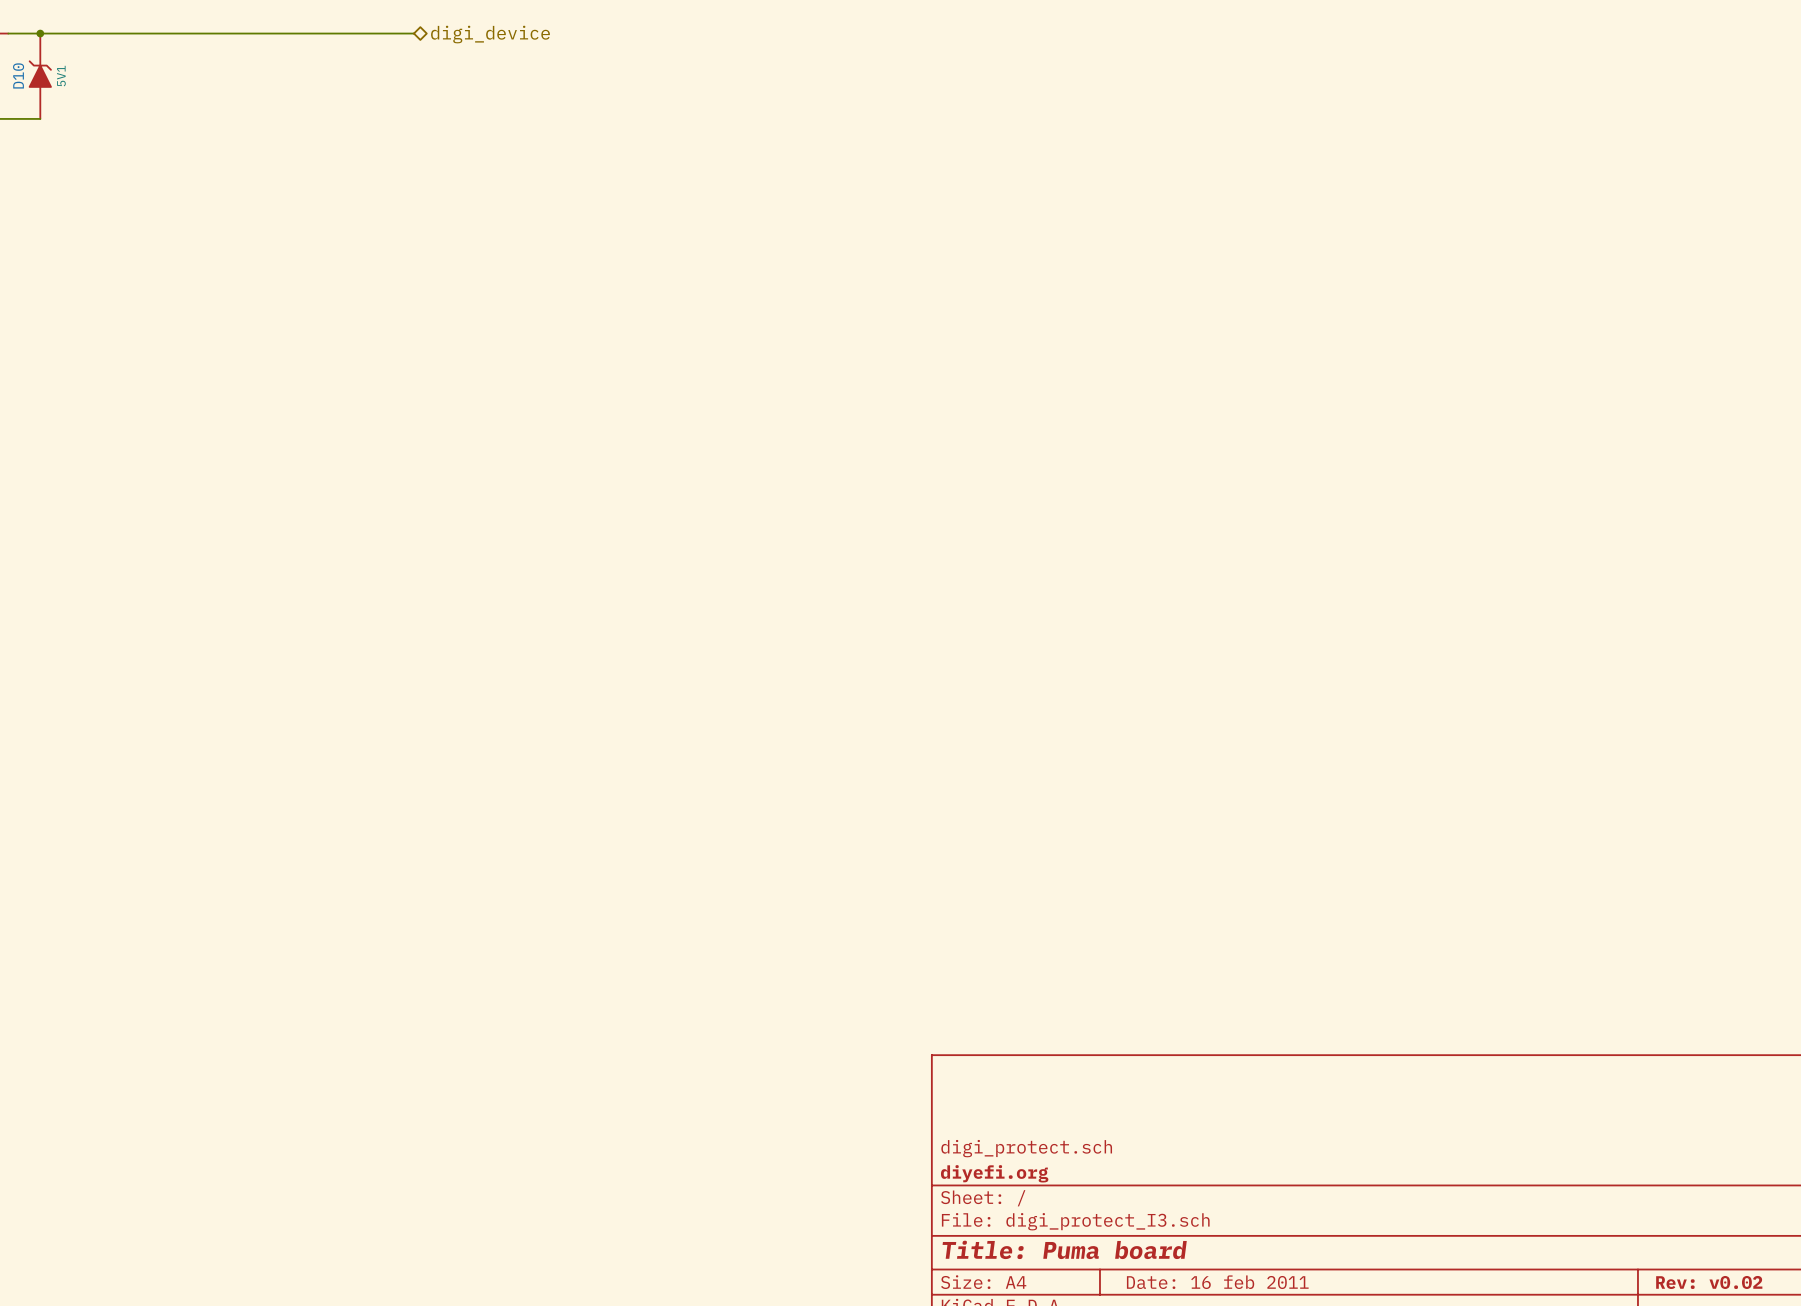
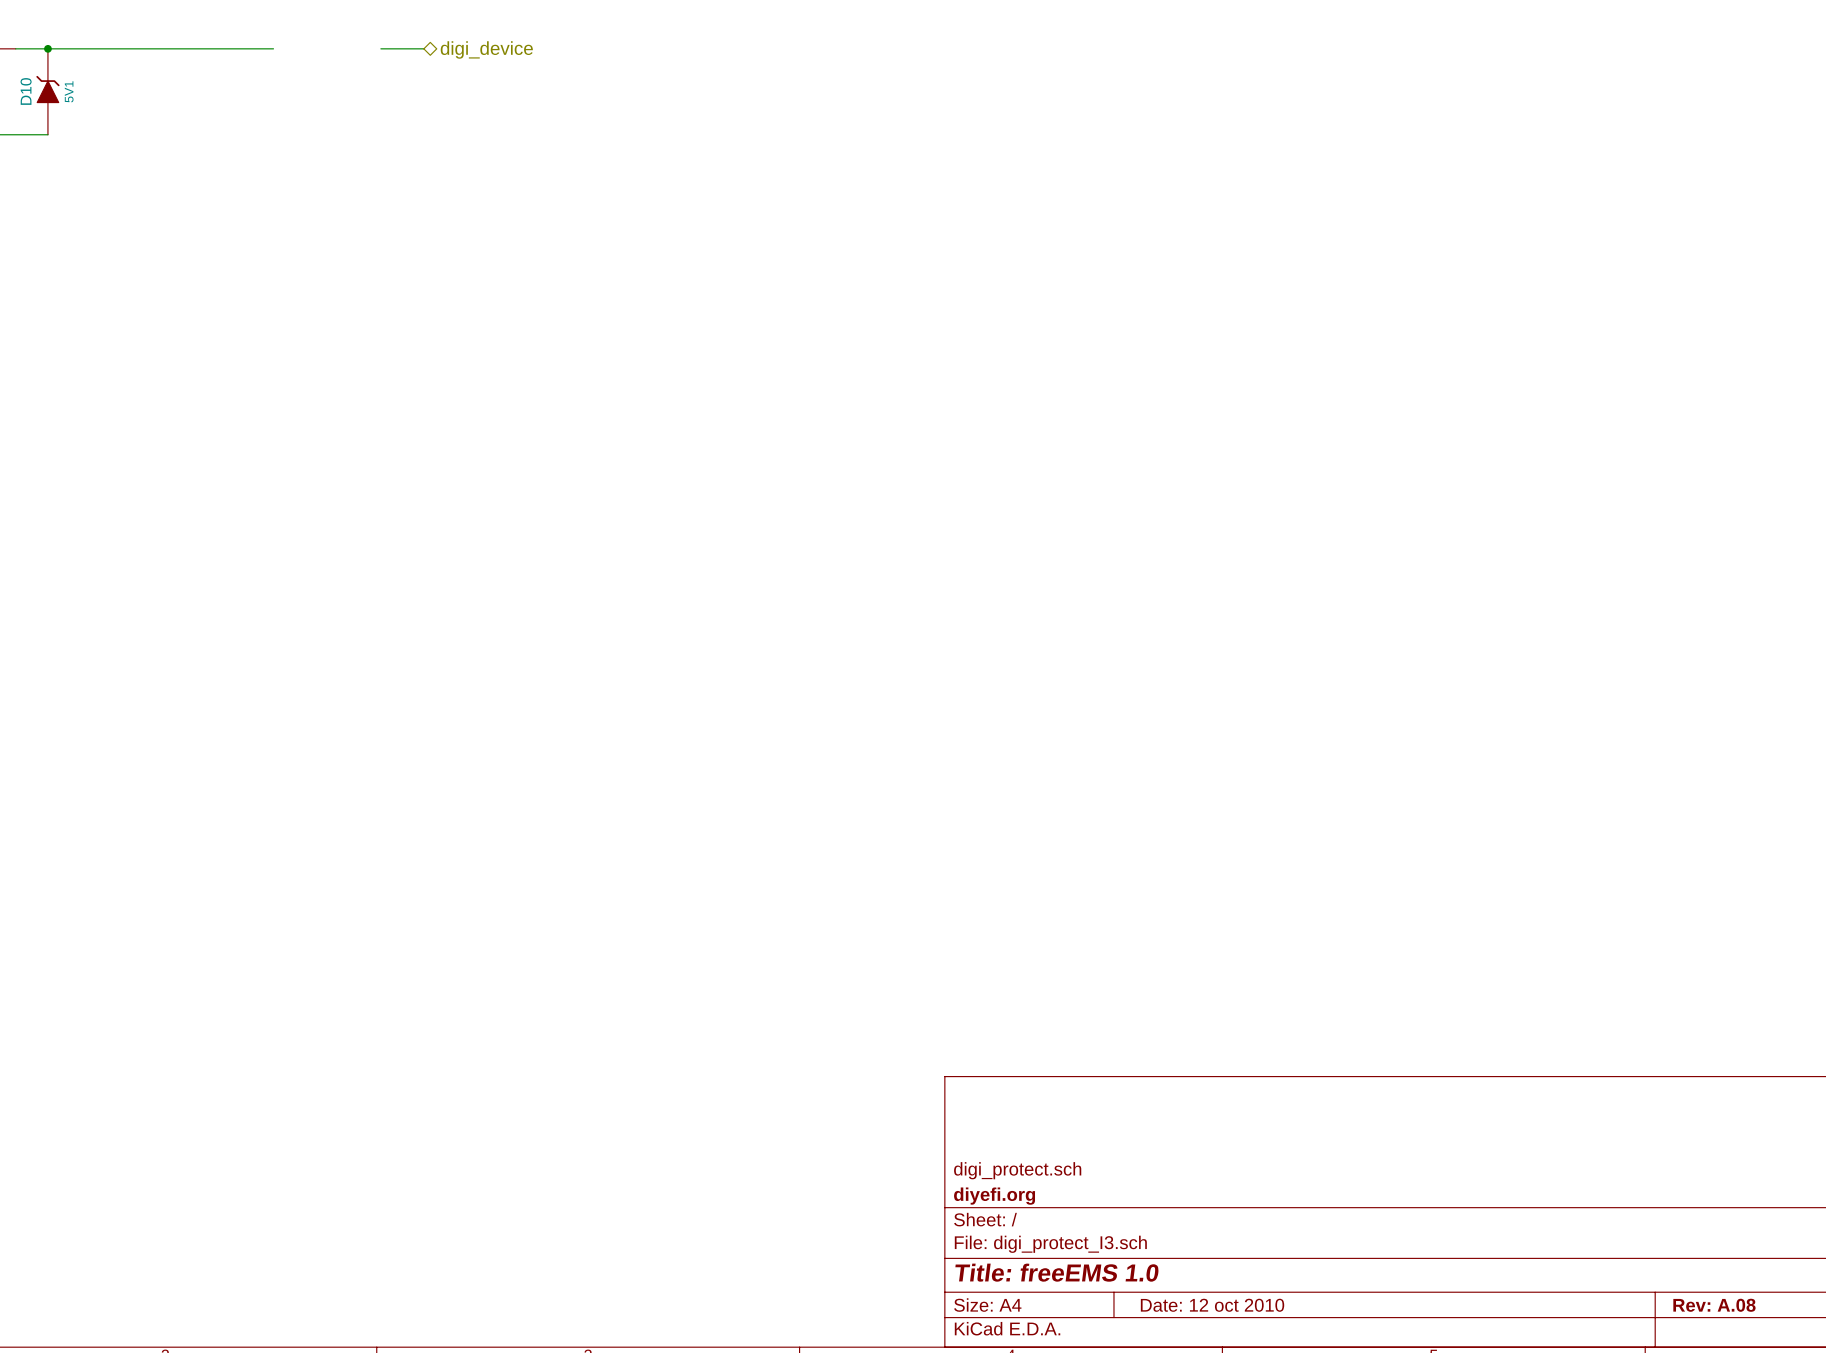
wire: (264, 33) (371, 33) -> none
title block: Title: Puma board (1064, 1249) -> Title: freeEMS 1.0 (1057, 1272)
title block: Date: 16 feb 2011 (1217, 1282) -> Date: 12 oct 2010 (1212, 1305)
title block: Rev: v0.02 (1709, 1282) -> Rev: A.08 (1714, 1305)

